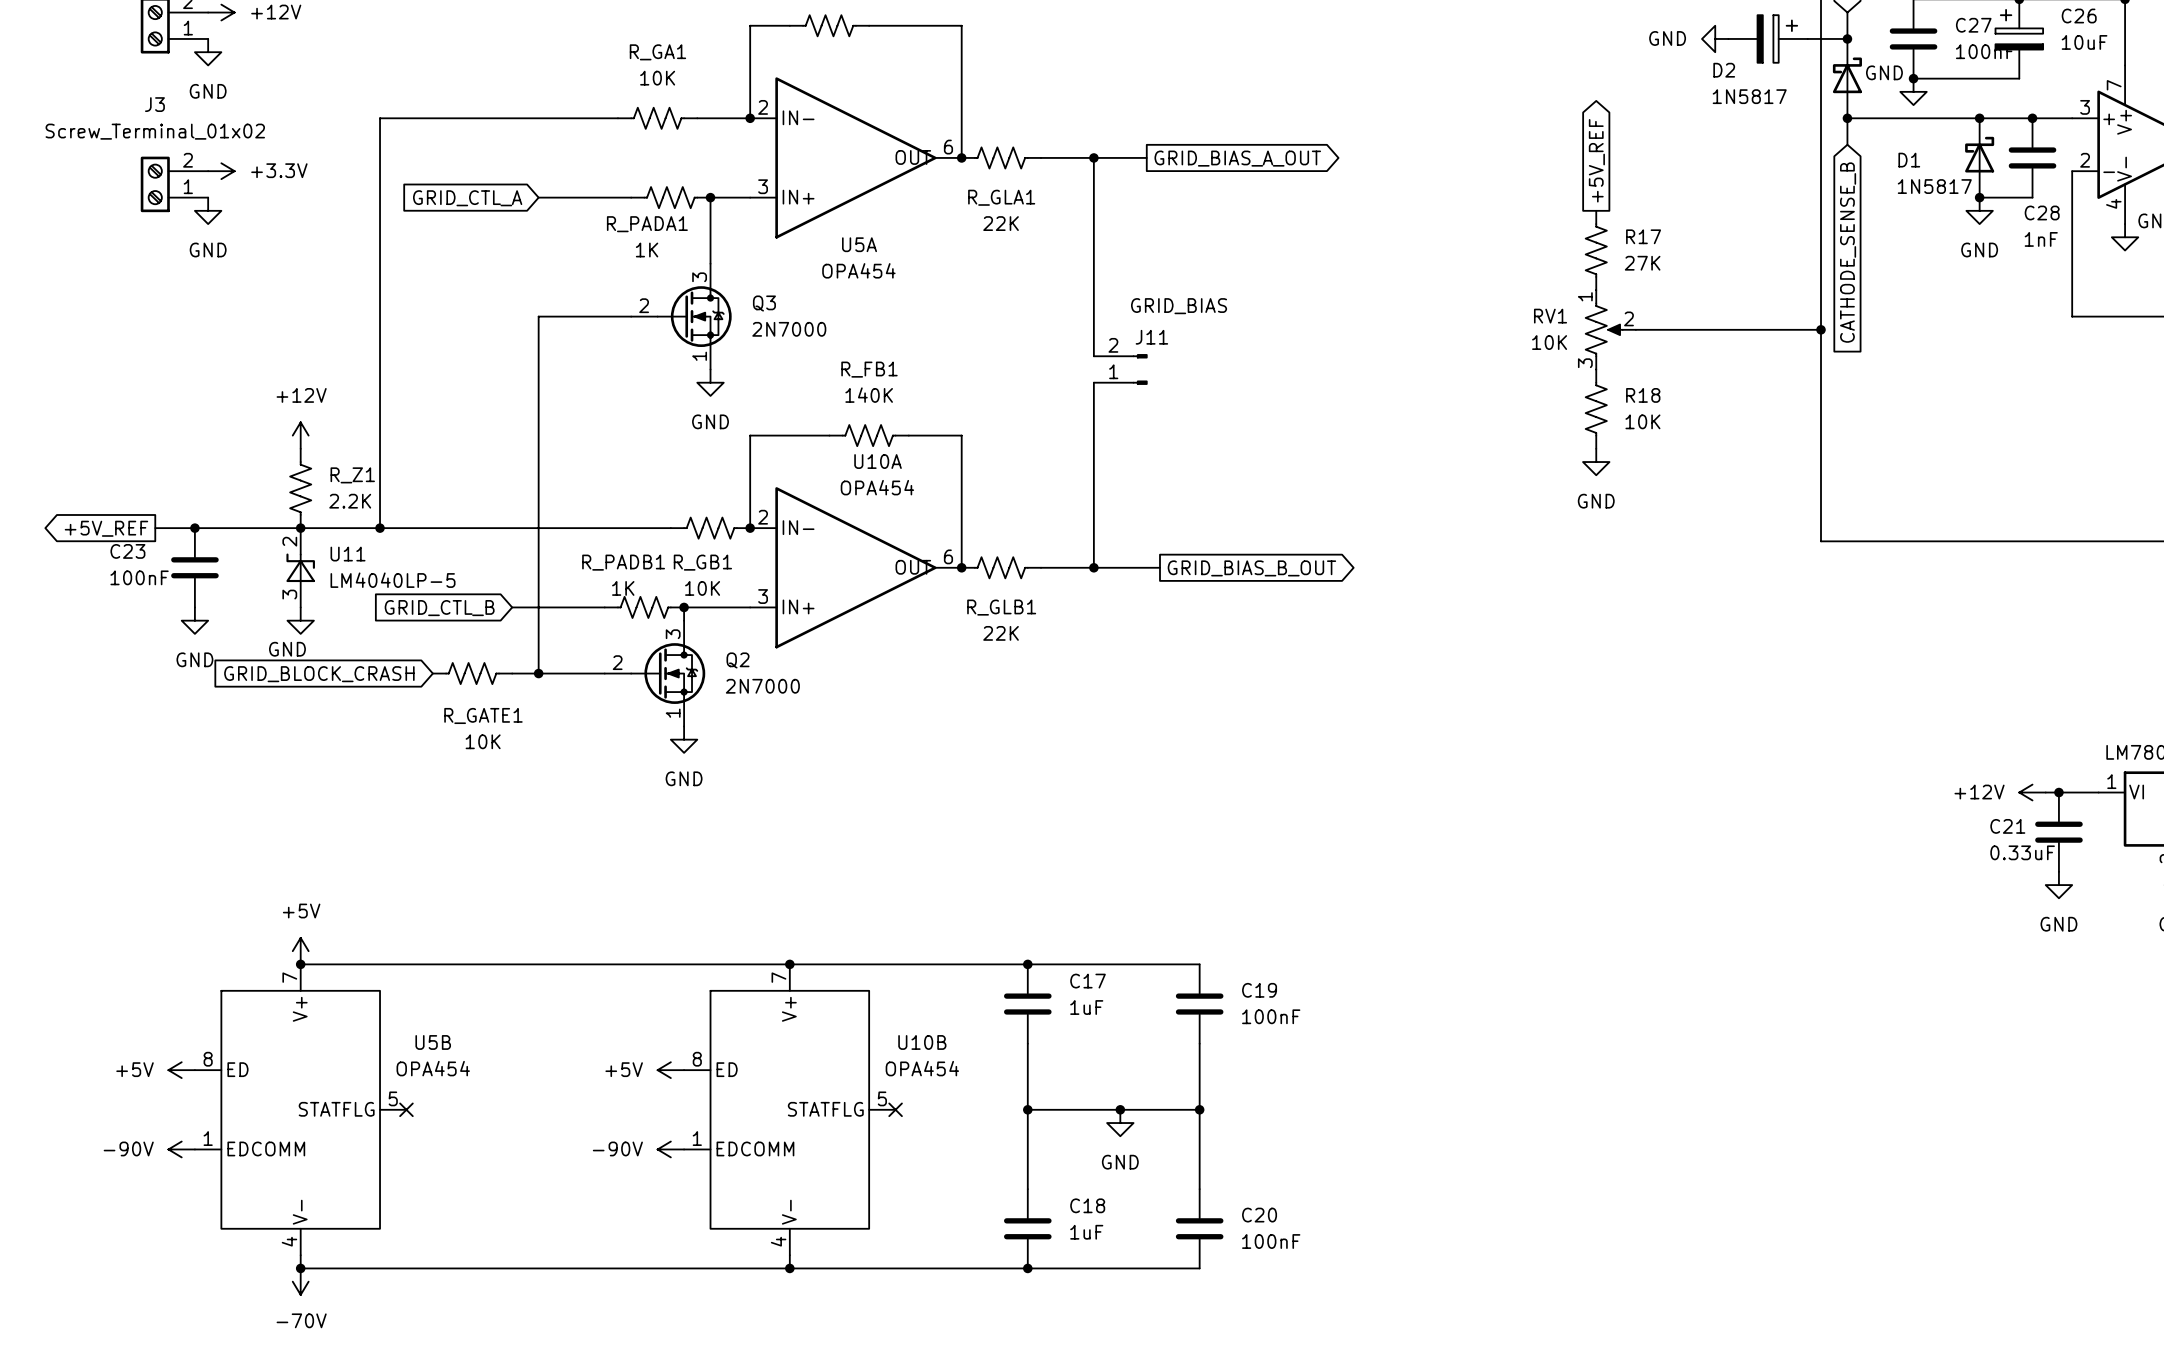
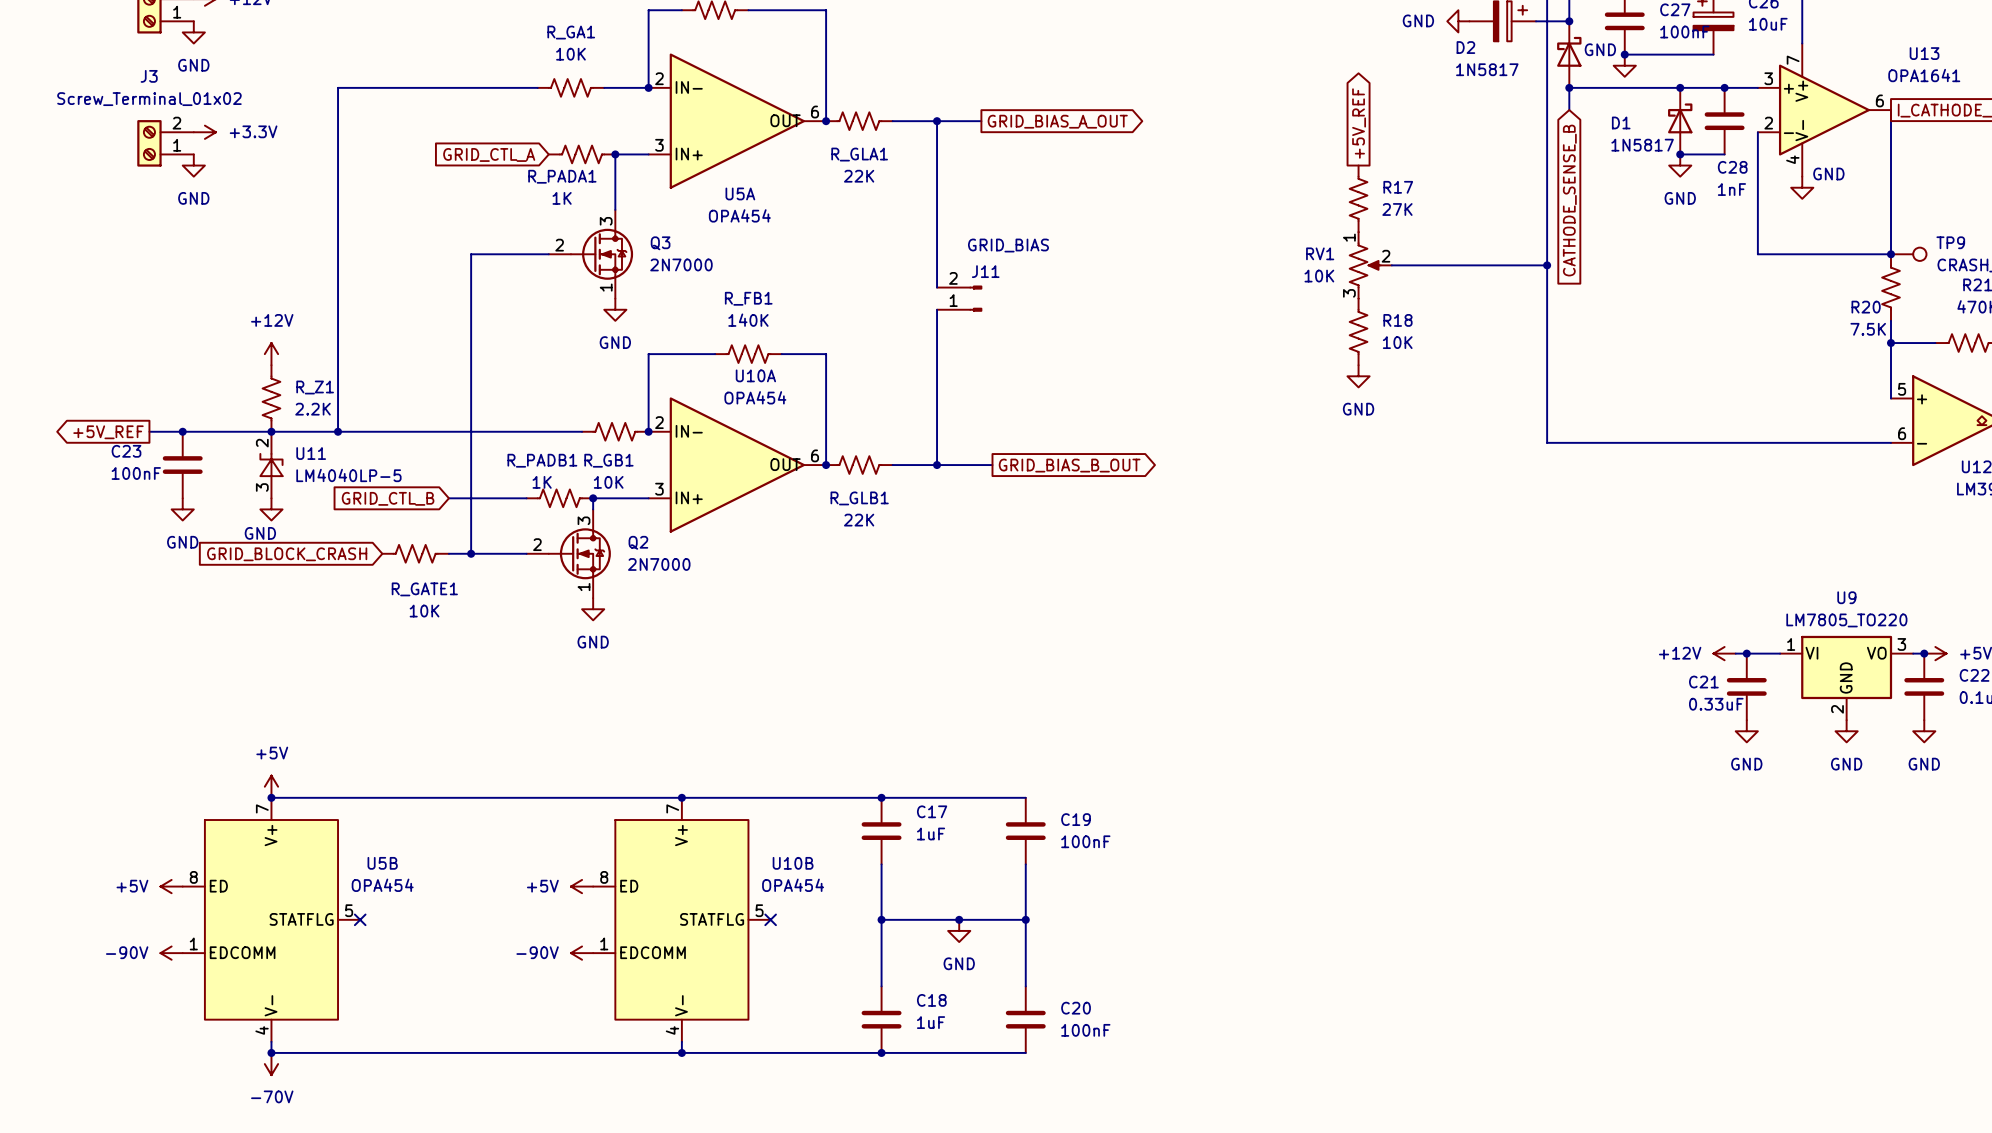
wire: (538, 197) (631, 197) -> none
global label position: GRID_CTL_A (467, 198) -> GRID_CTL_A (489, 154)

